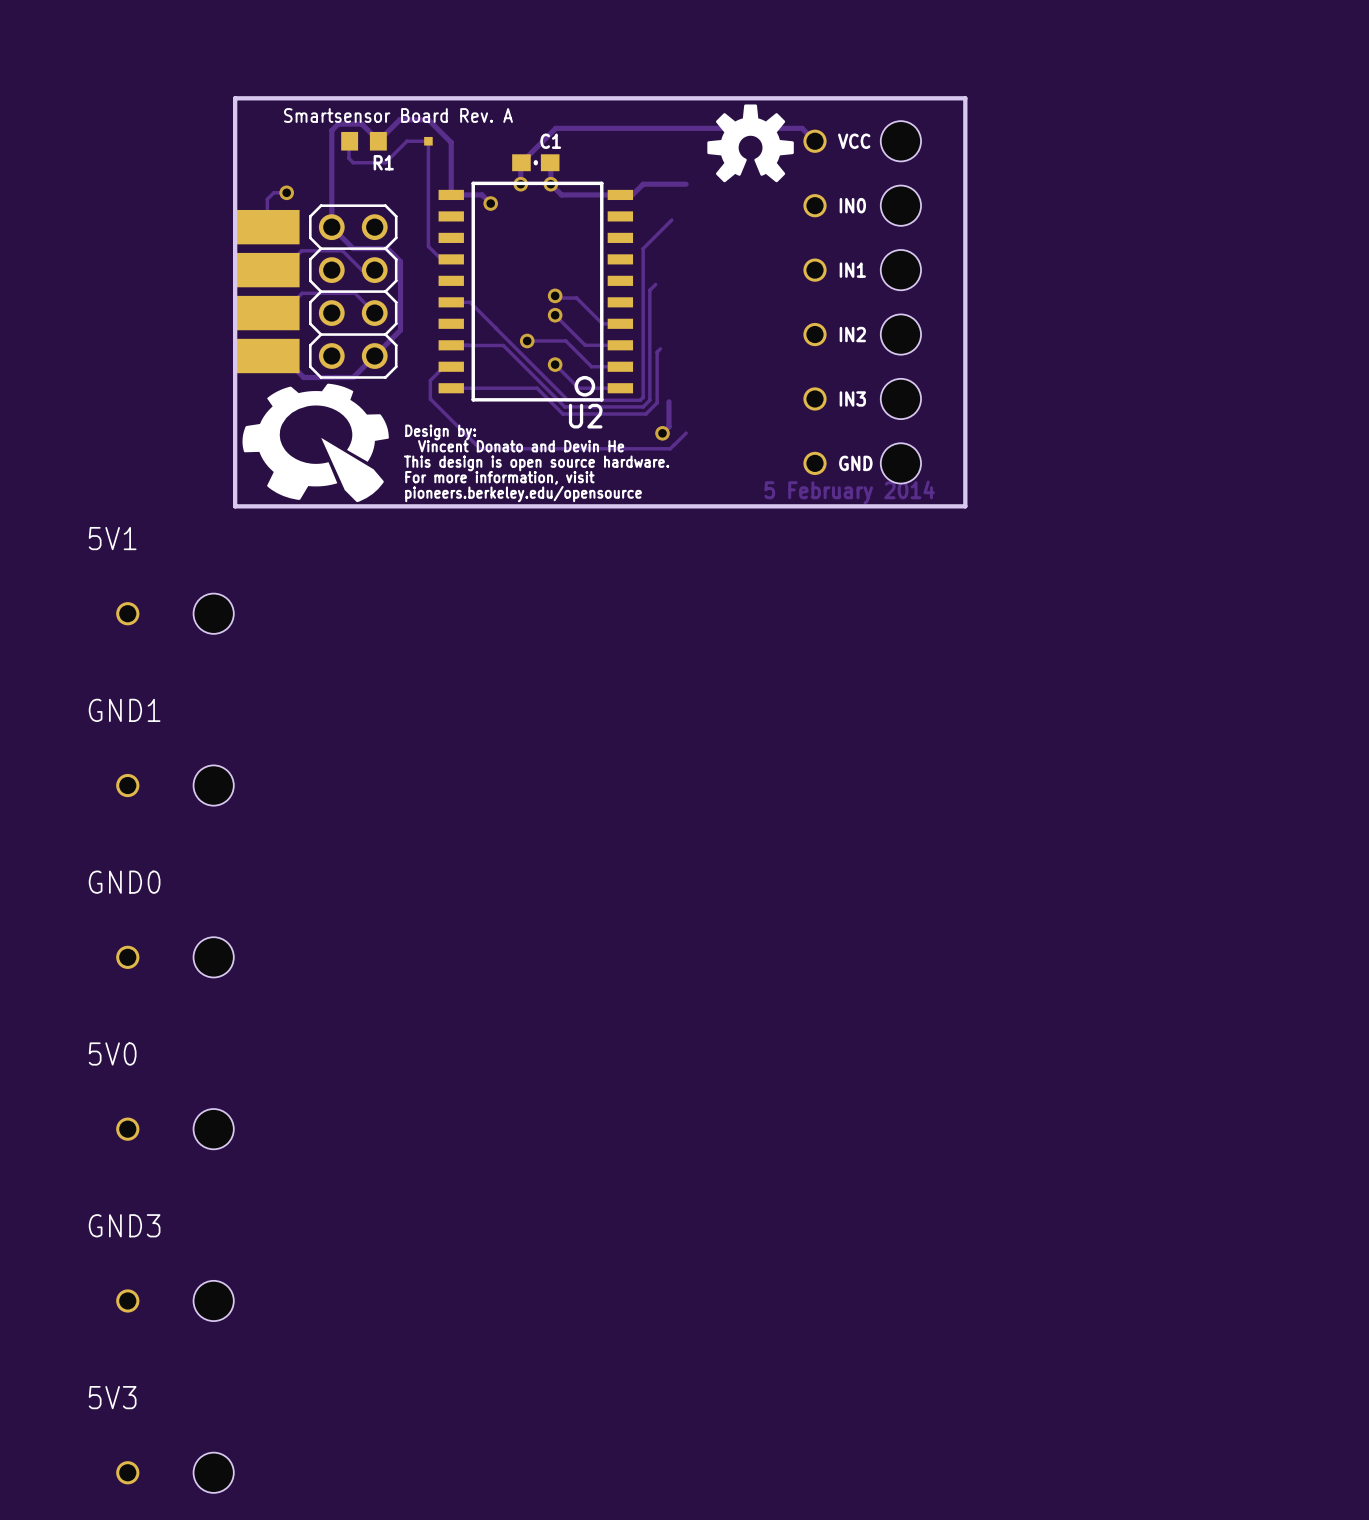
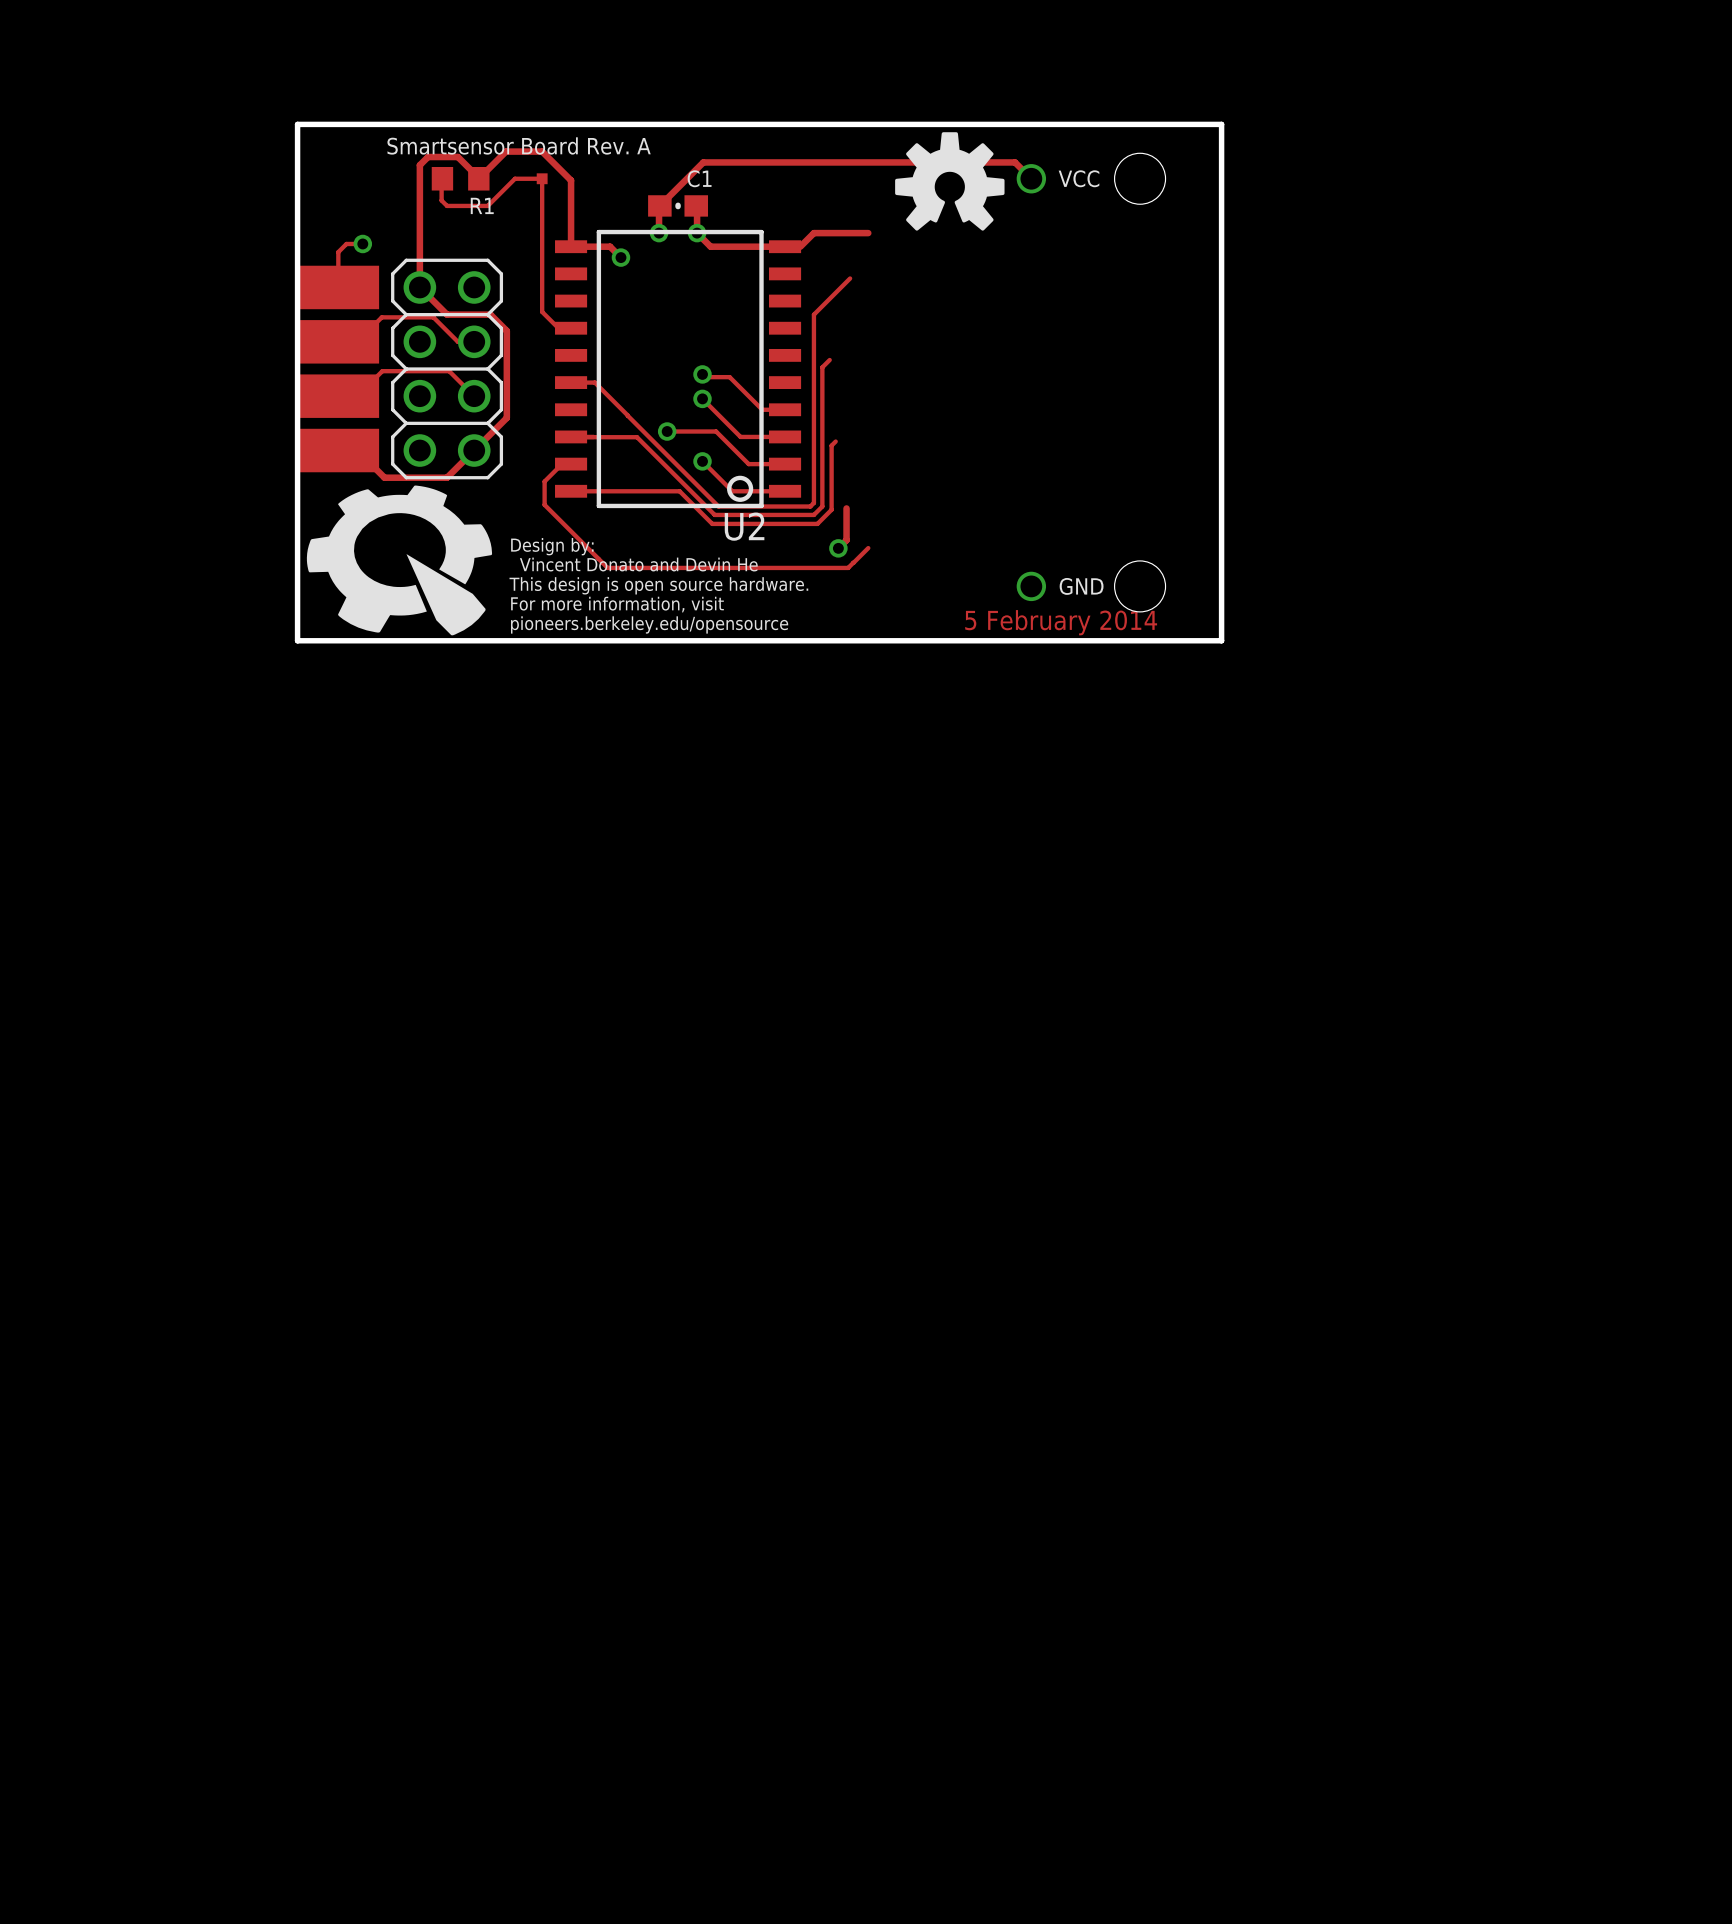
IN0: (862, 205) -> none
IN1: (862, 270) -> none
IN2: (862, 334) -> none
IN3: (862, 398) -> none
5V1: (174, 613) -> none
GND1: (174, 785) -> none
GND0: (174, 957) -> none
5V0: (174, 1129) -> none
GND3: (174, 1300) -> none
5V3: (174, 1472) -> none

